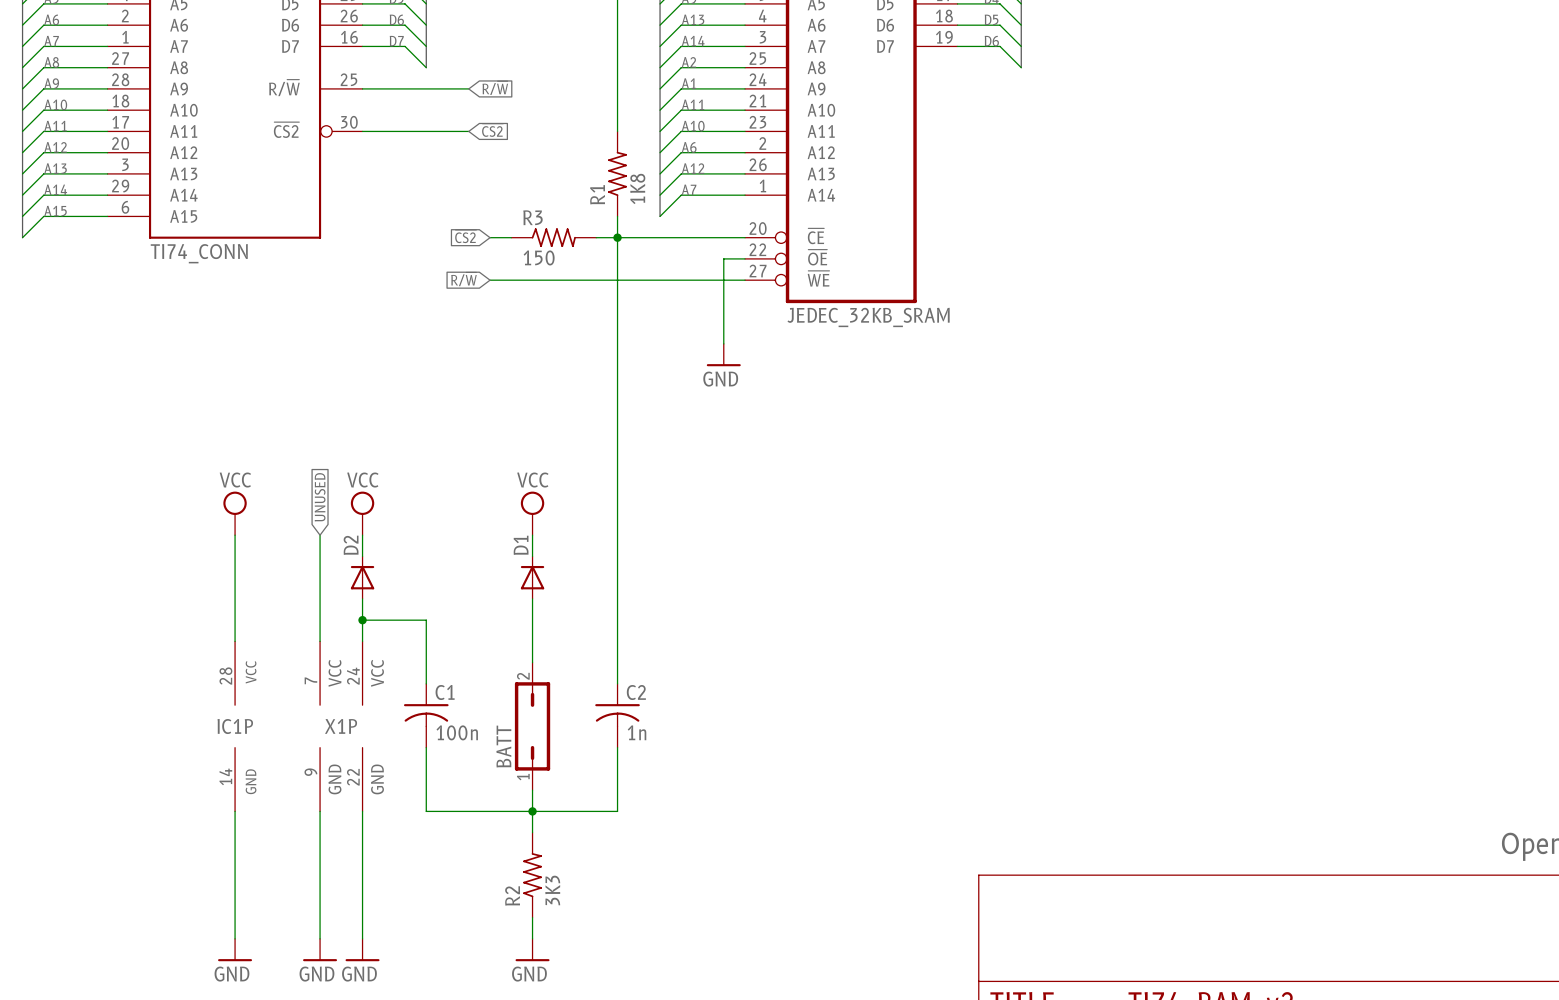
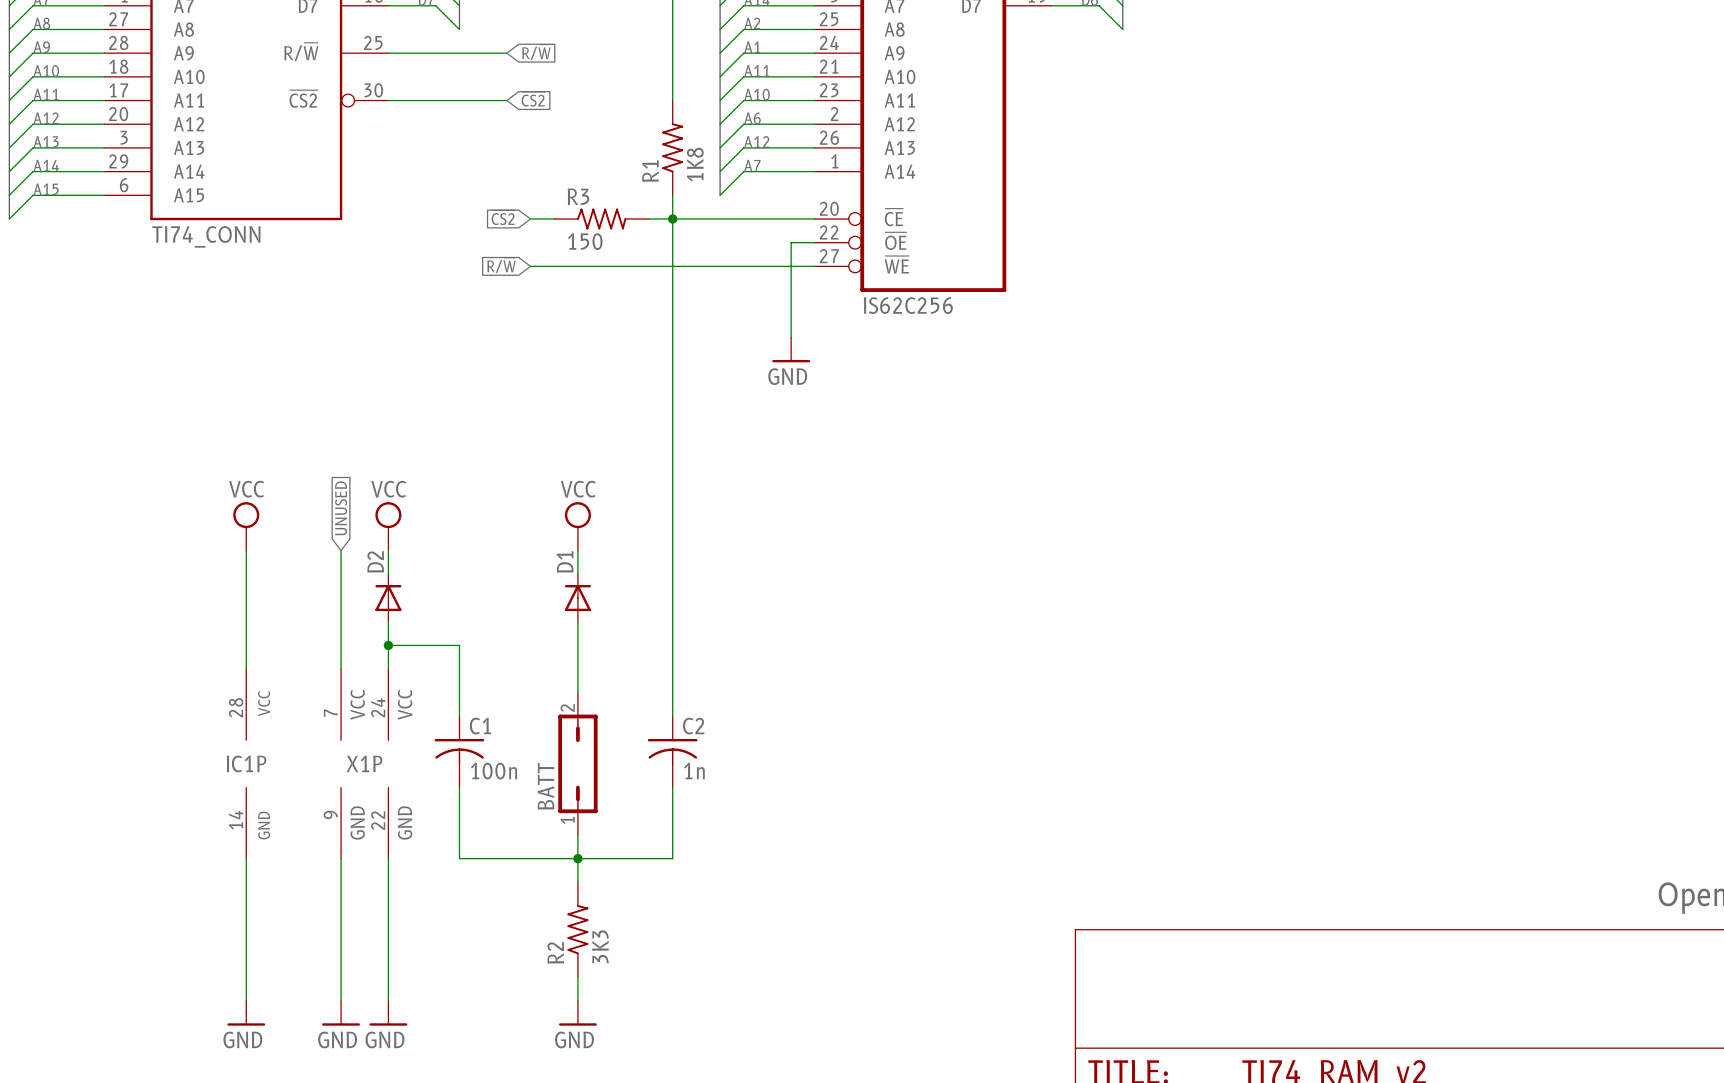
part value: JEDEC_32KB_SRAM (868, 317) -> IS62C256 (908, 305)

